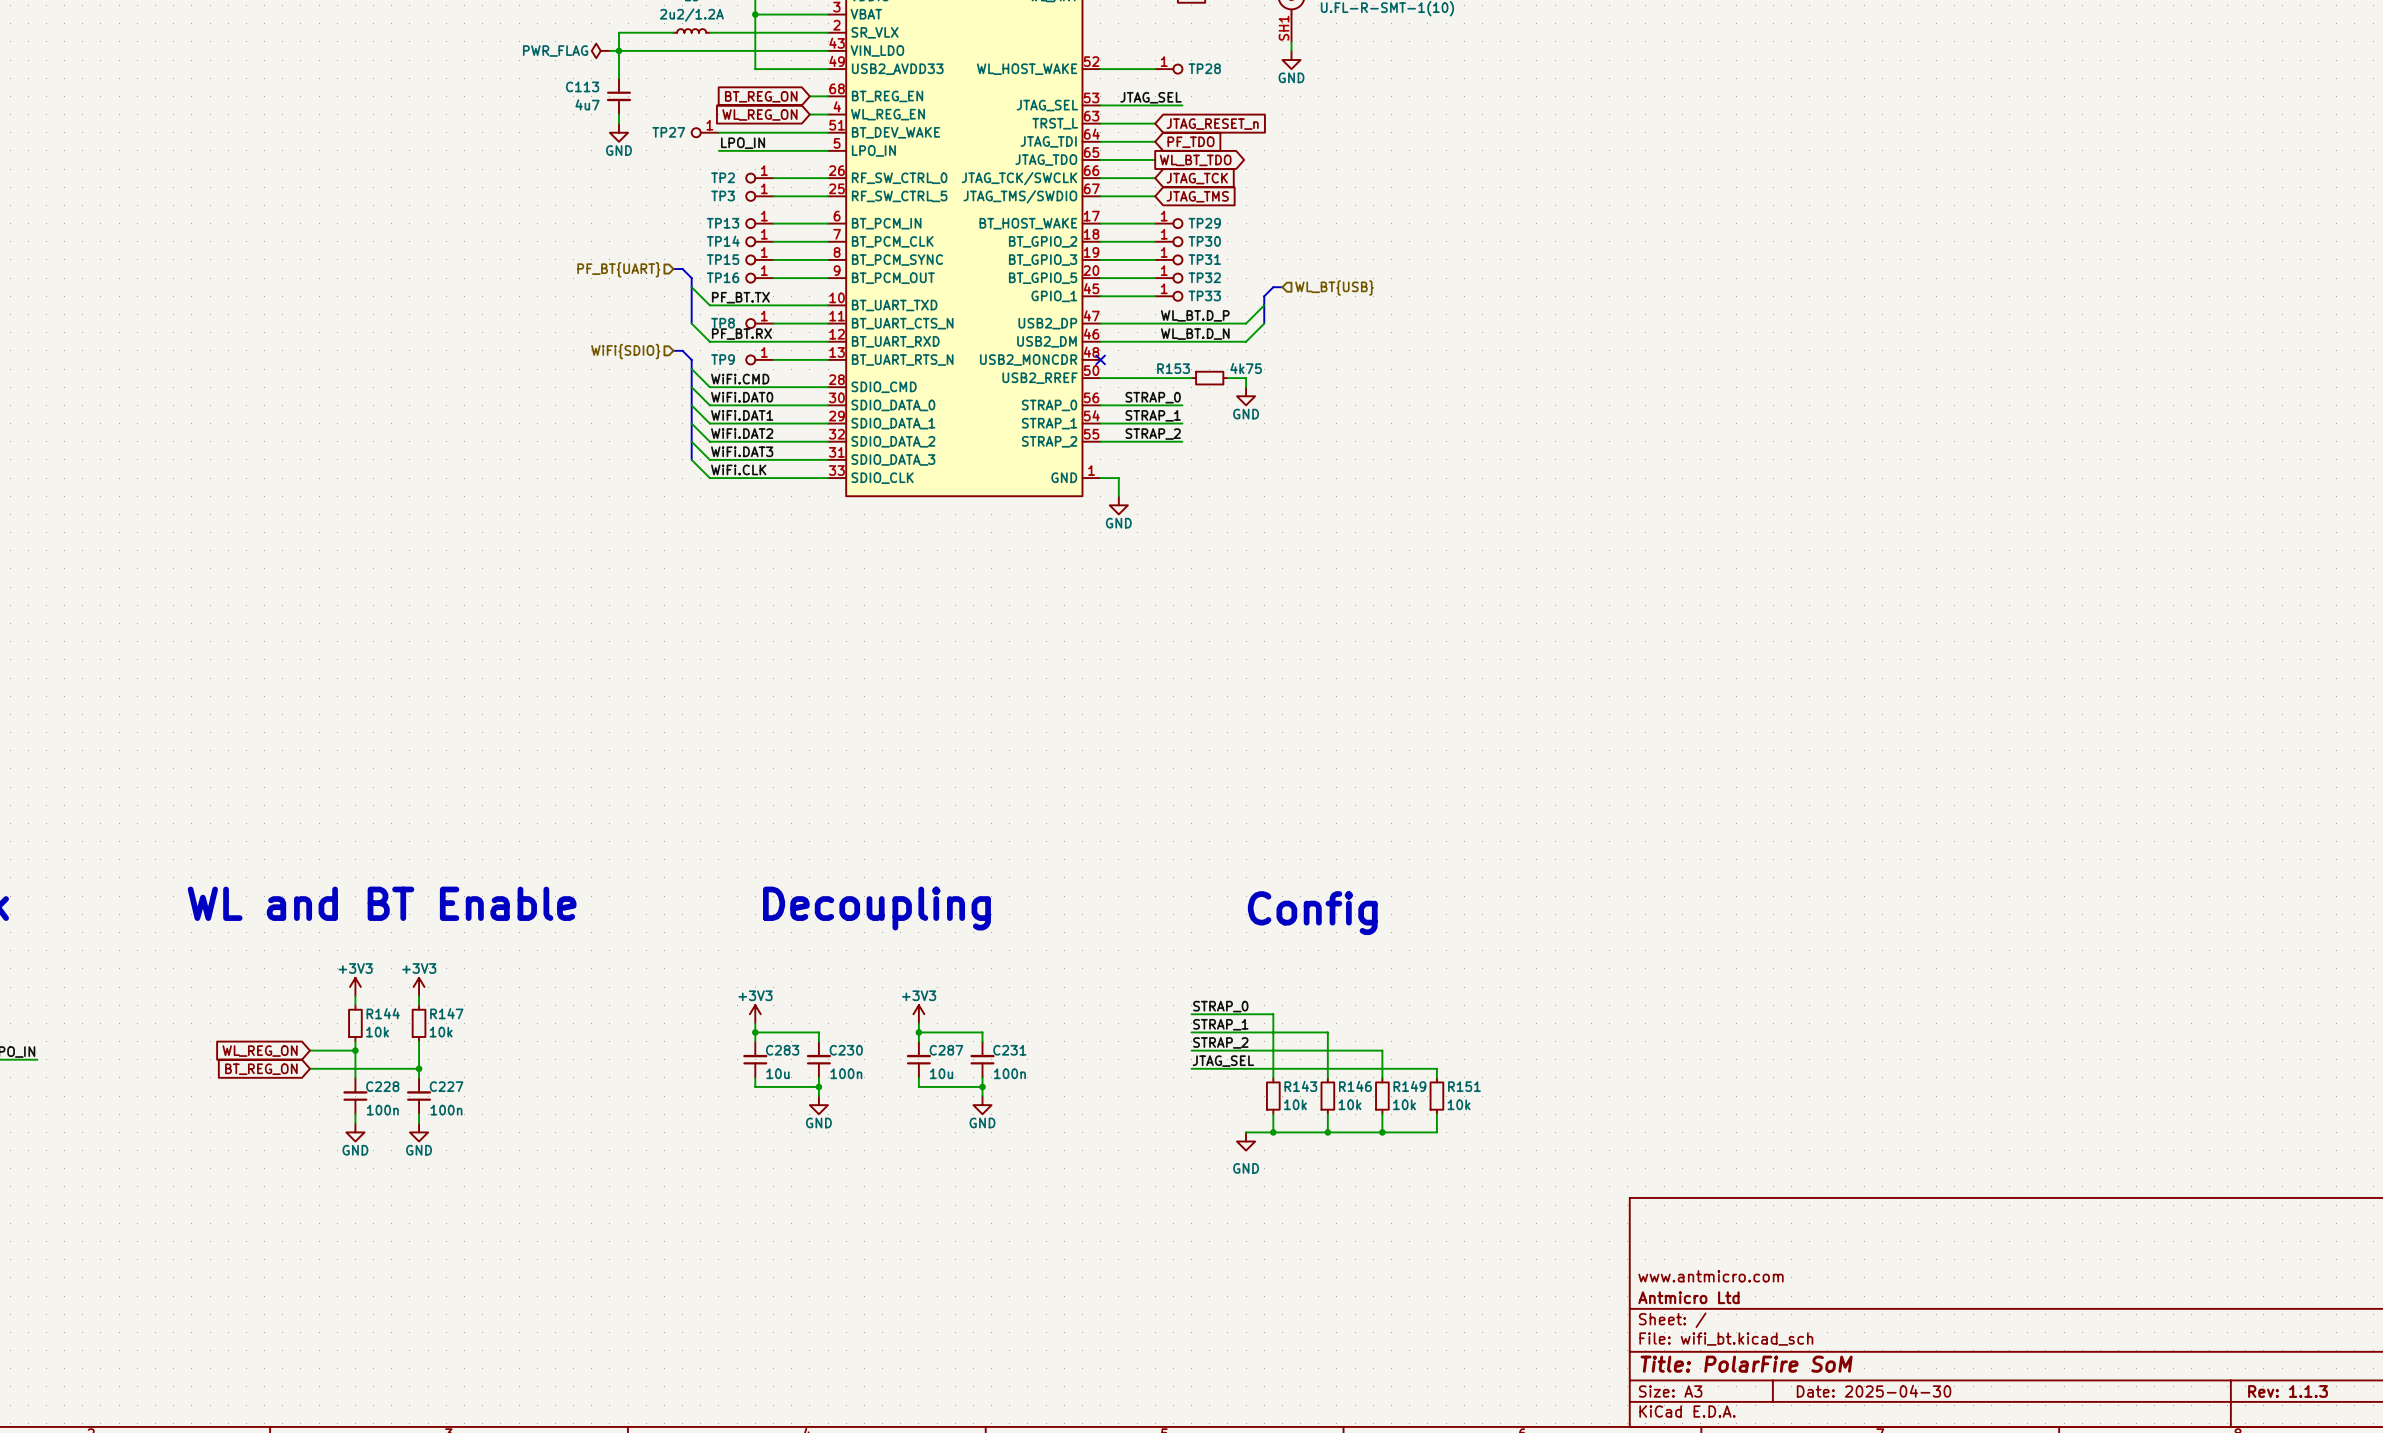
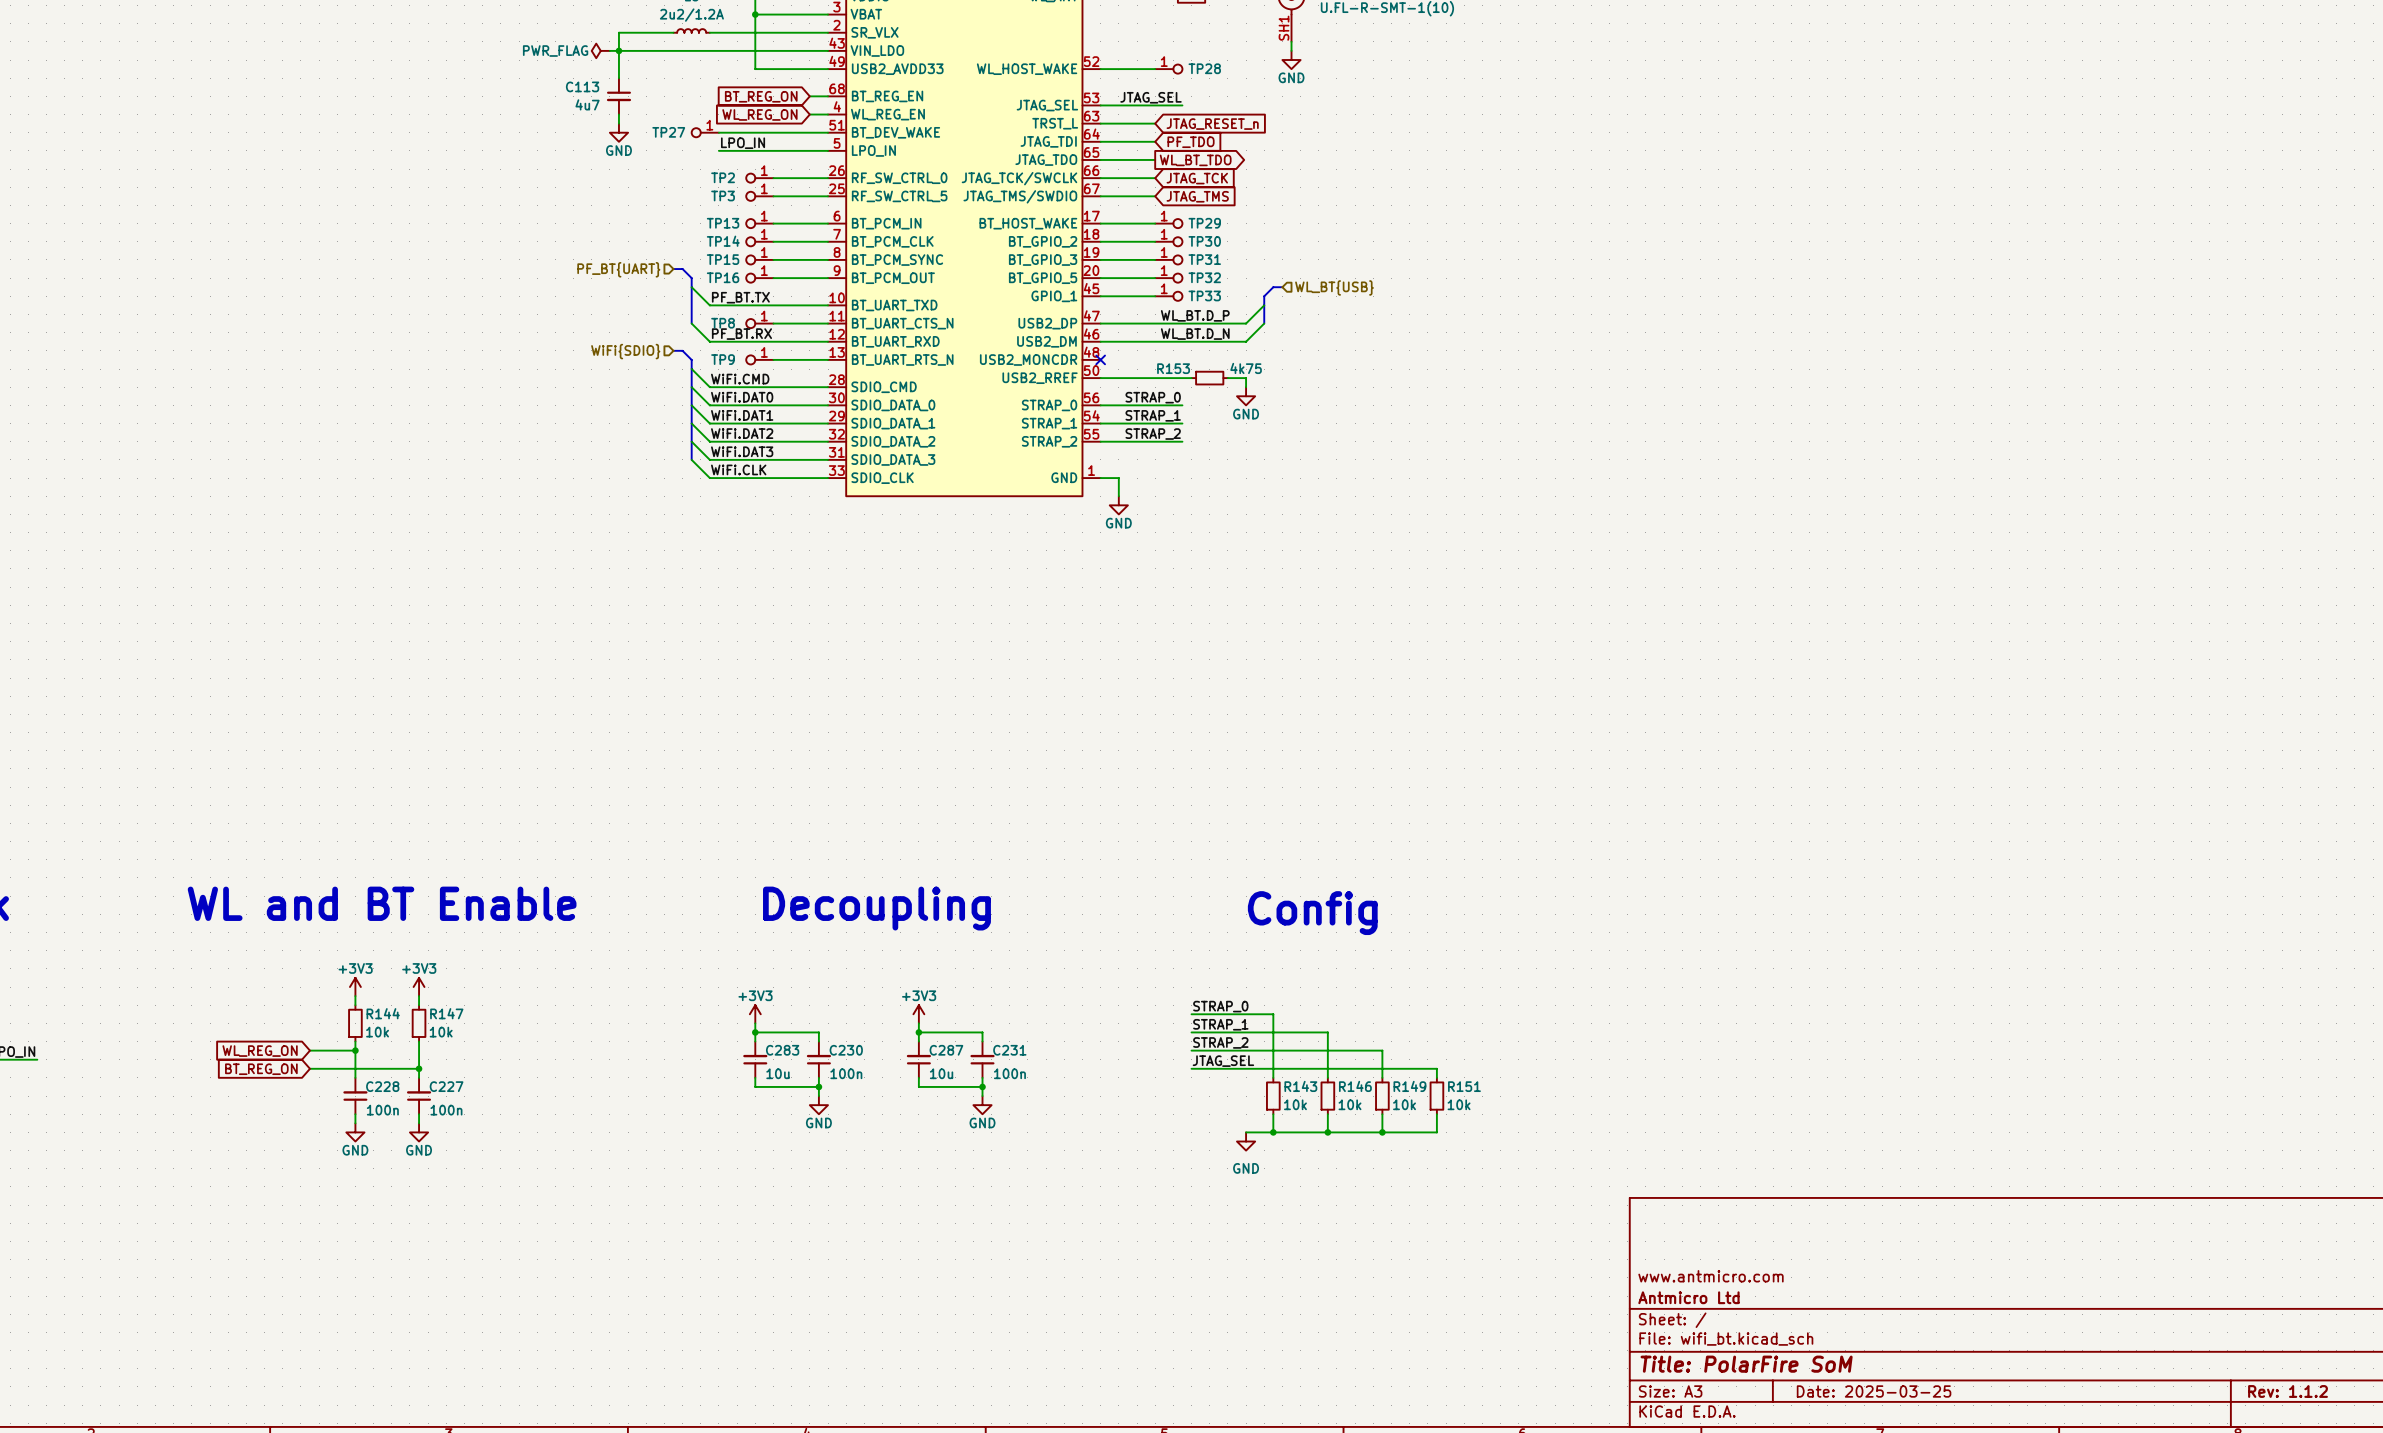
title block: Date: 2025-04-30 (1874, 1391) -> Date: 2025-03-25 (1874, 1391)
title block: Rev: 1.1.3 (2288, 1391) -> Rev: 1.1.2 (2288, 1391)

